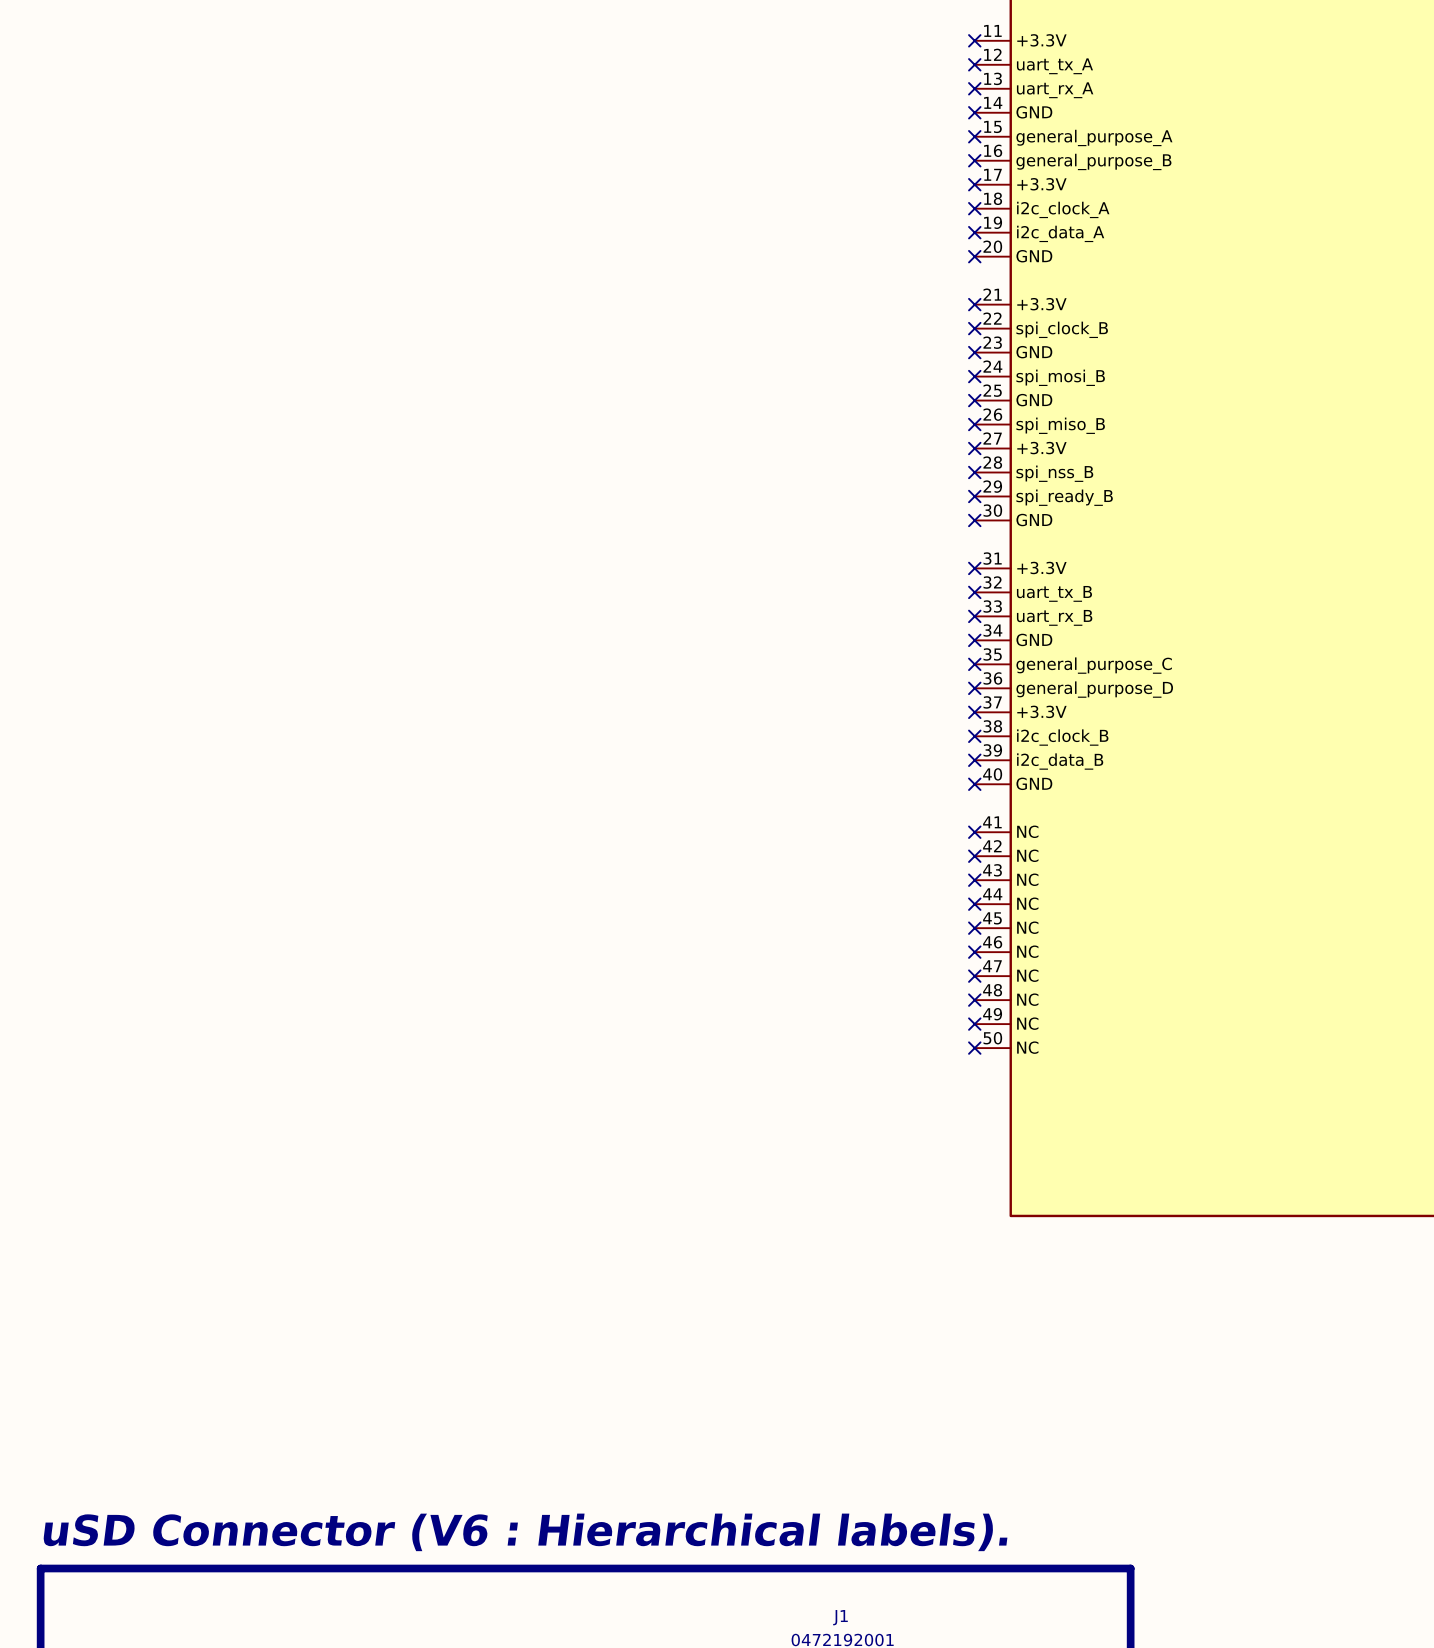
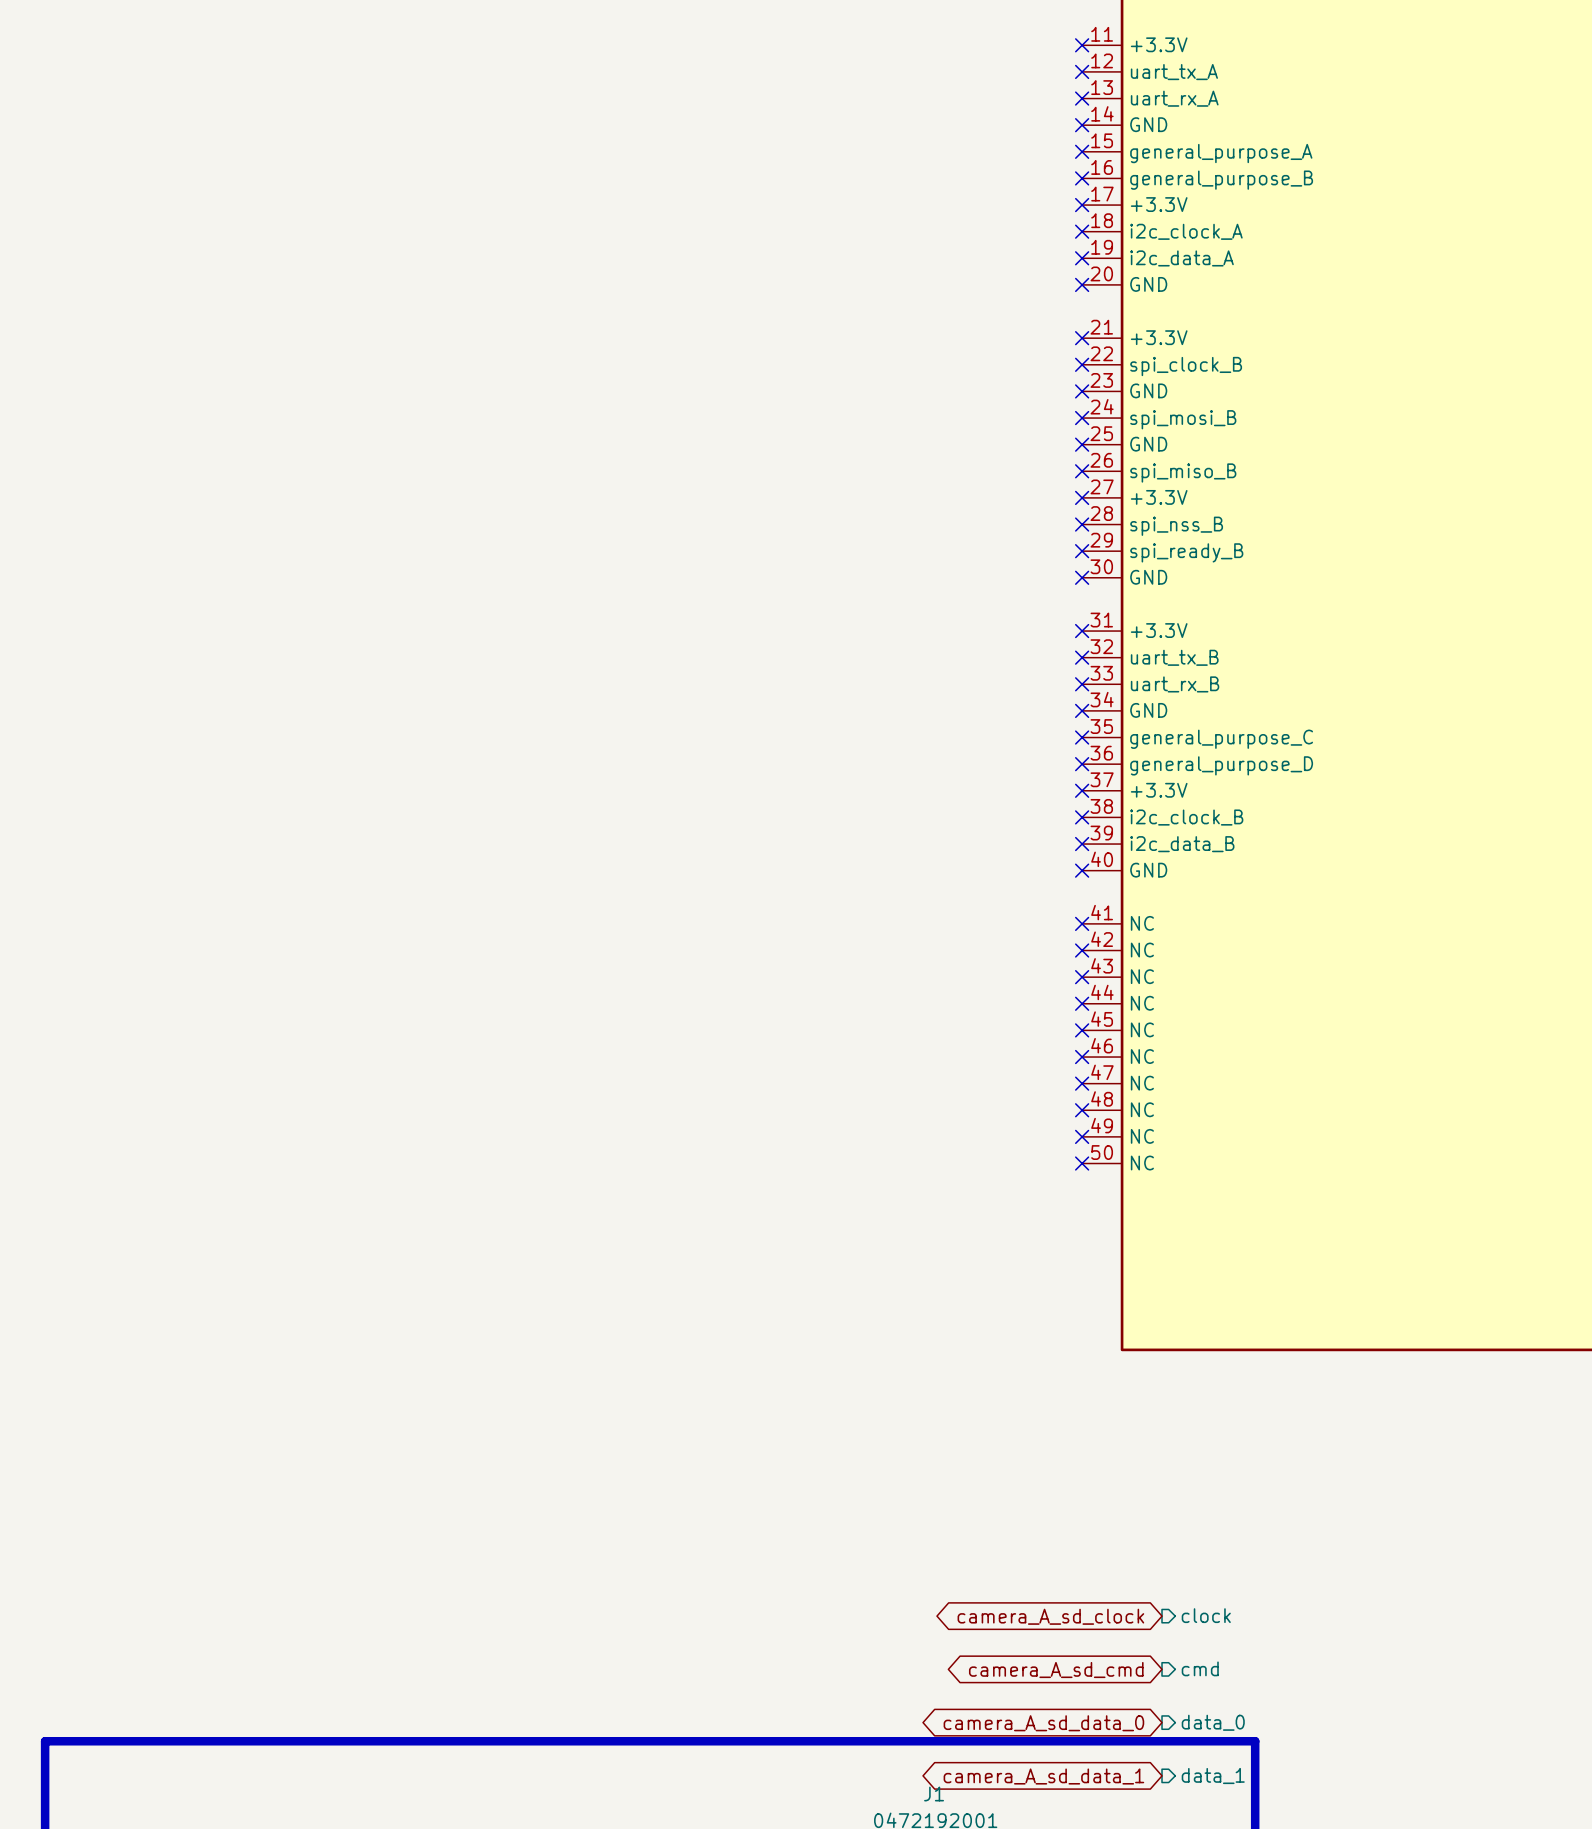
sheet pin: none -> clock (1206, 1615)
global label: none -> camera_A_sd_clock (1050, 1616)
sheet pin: none -> cmd (1200, 1668)
global label: none -> camera_A_sd_cmd (1056, 1670)
text: uSD Connector (V6 : Hierarchical labels). (525, 1532) -> none
sheet pin: none -> data_0 (1213, 1722)
global label: none -> camera_A_sd_data_0 (1043, 1723)
sheet pin: none -> data_1 (1213, 1776)
global label: none -> camera_A_sd_data_1 (1043, 1776)

